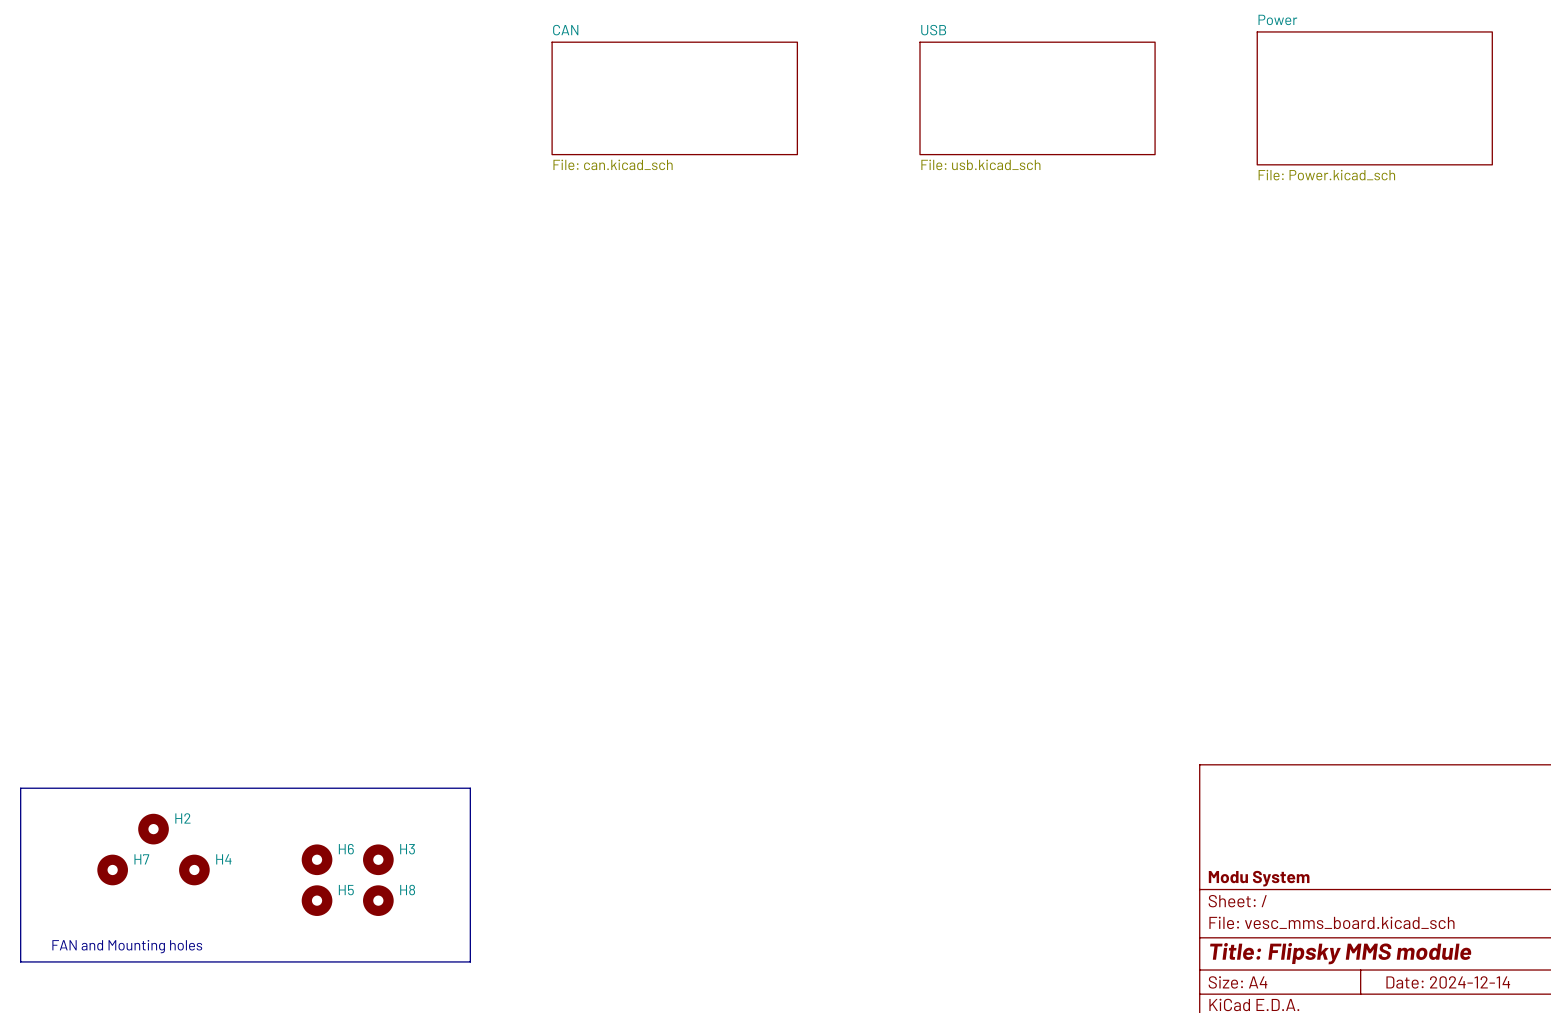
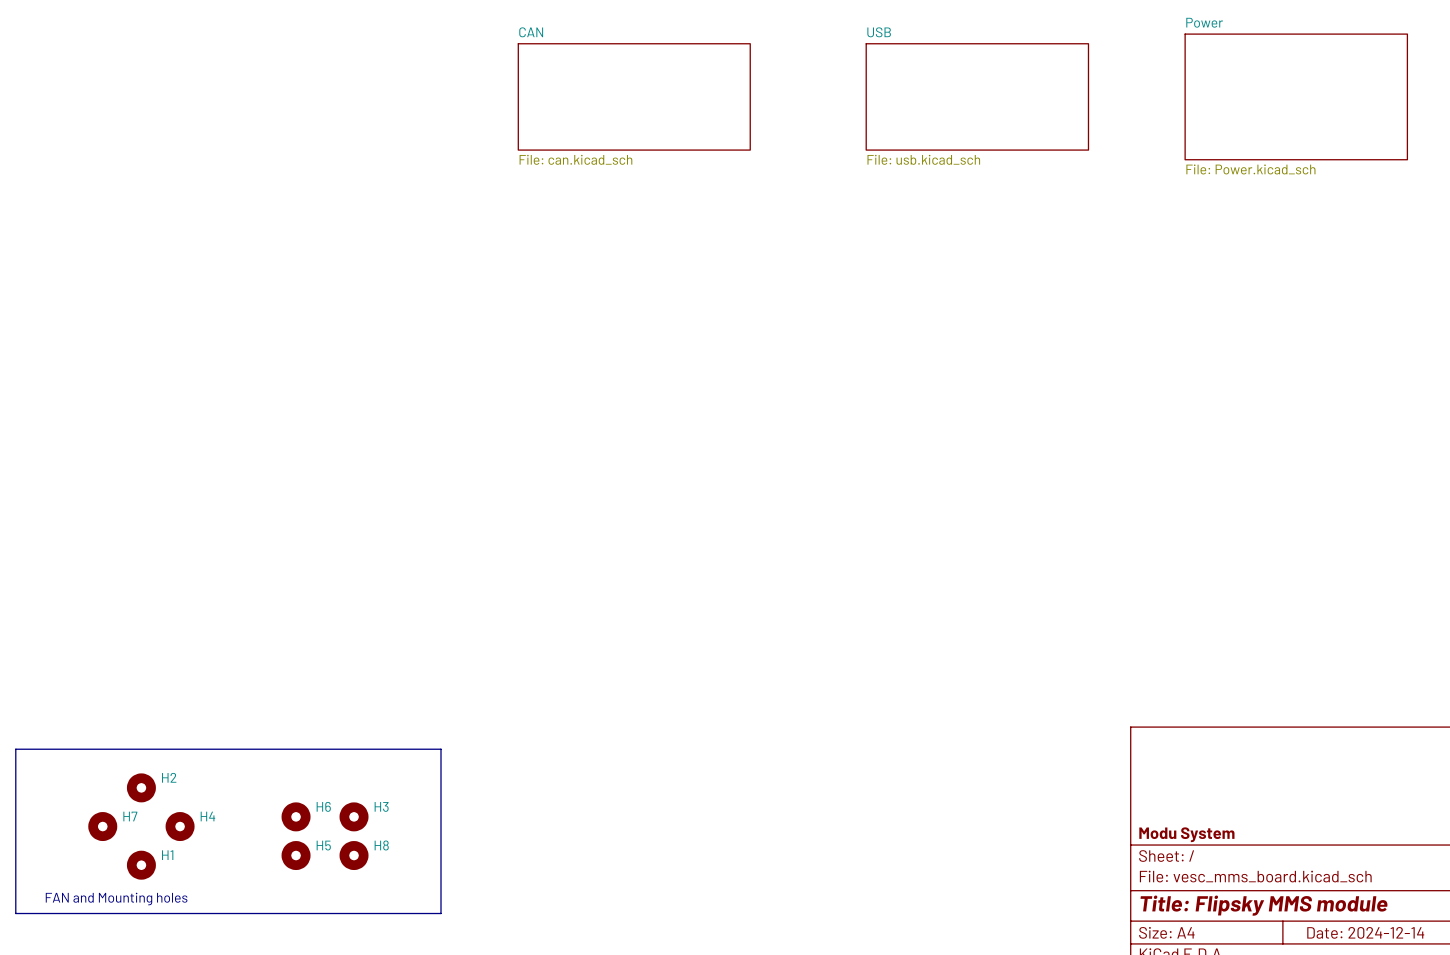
H1: none -> (141, 865)

